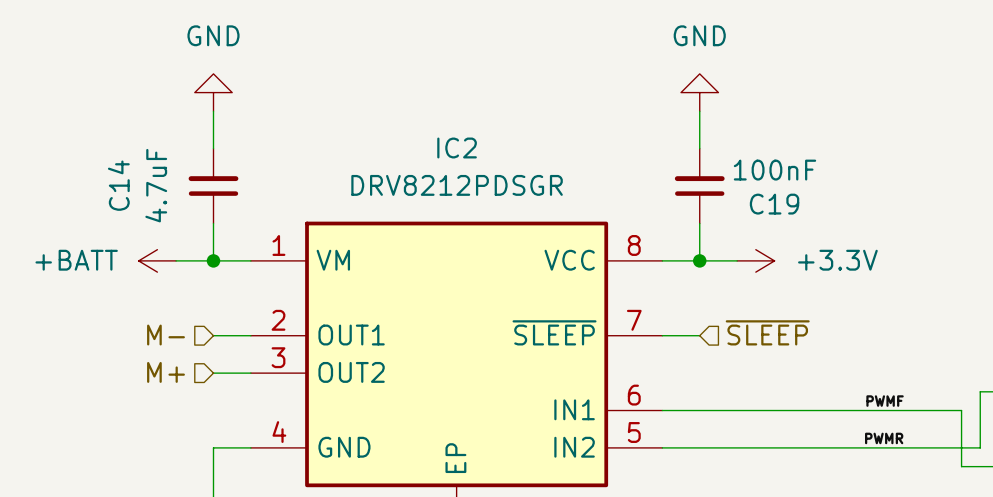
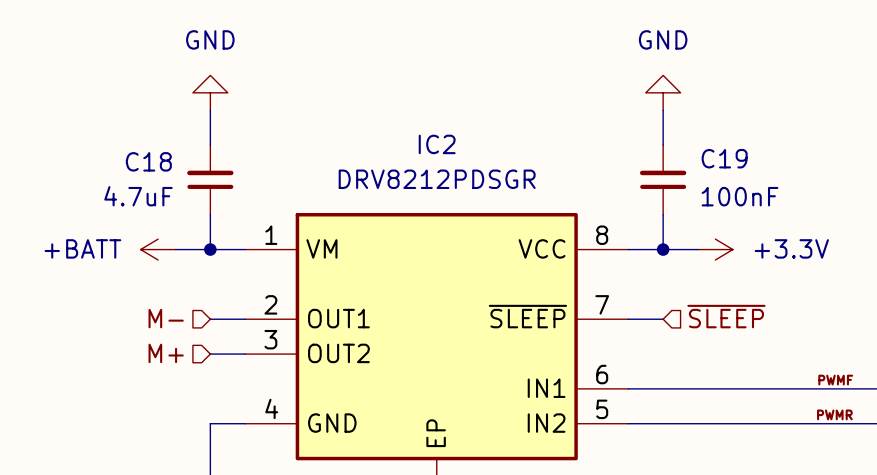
C19 value position: 100nF (774, 170) -> 100nF (739, 196)
C14 name: C14 (118, 185) -> C18 (148, 161)
C14 value rotation: 0° (156, 185) -> 90° clockwise (138, 196)
C19 name position: C19 (774, 204) -> C19 (724, 158)

